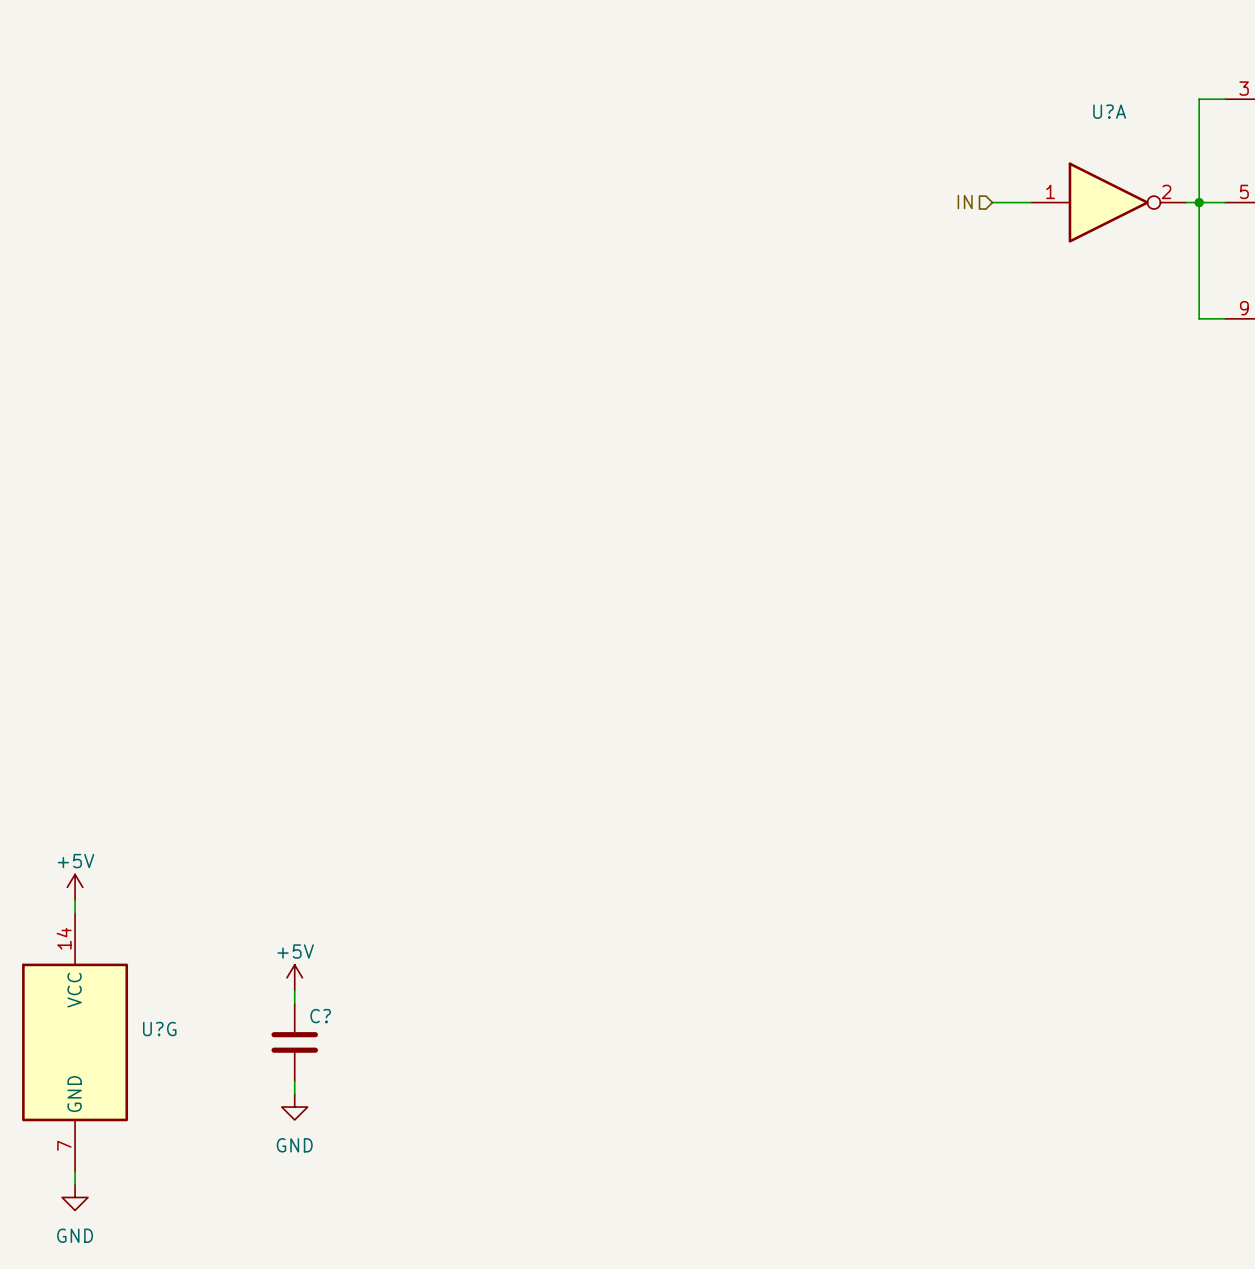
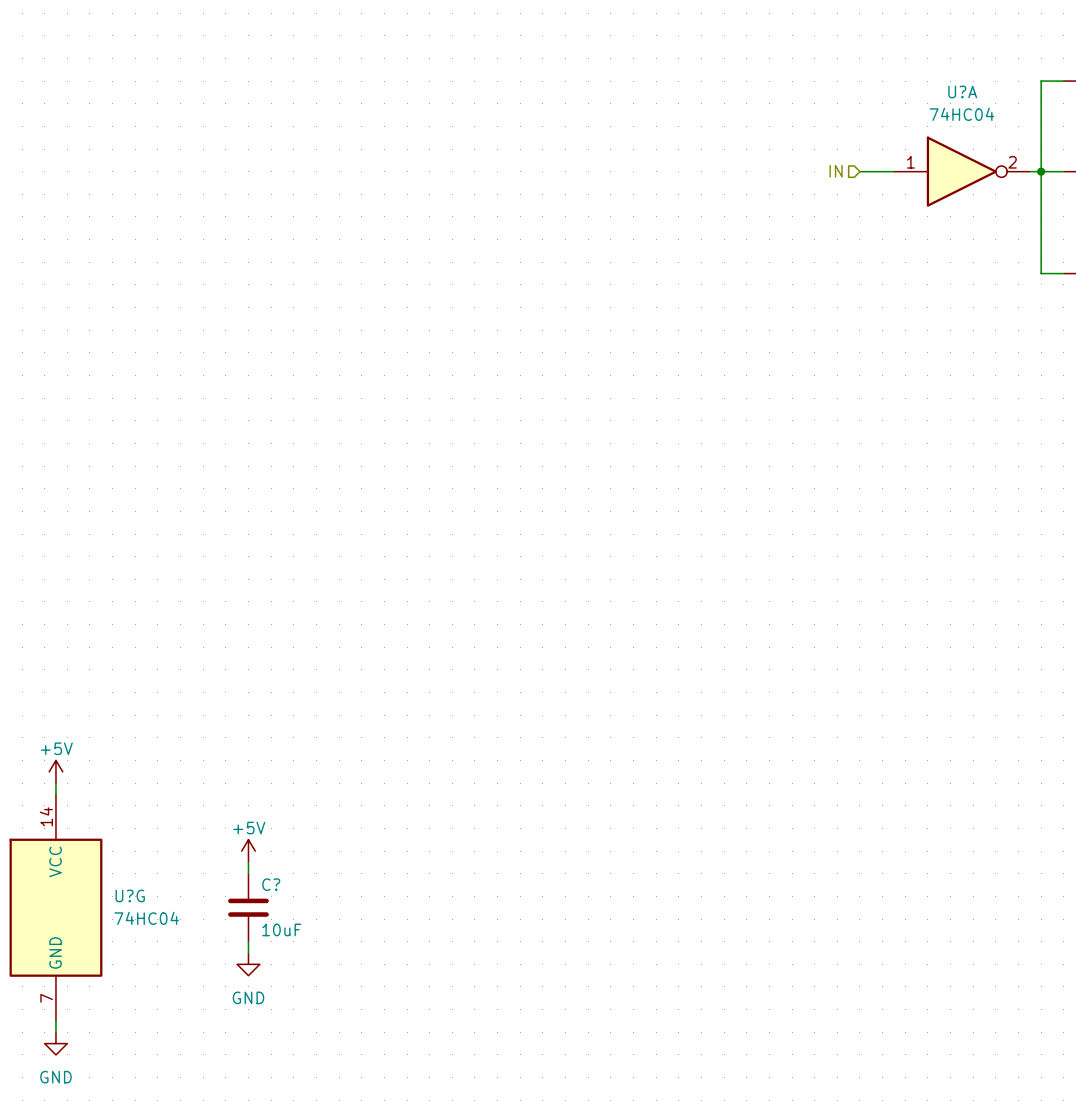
U?A value: none -> 74HC04 (961, 114)
U?G value: none -> 74HC04 (146, 918)
C? value: none -> 10uF (281, 929)

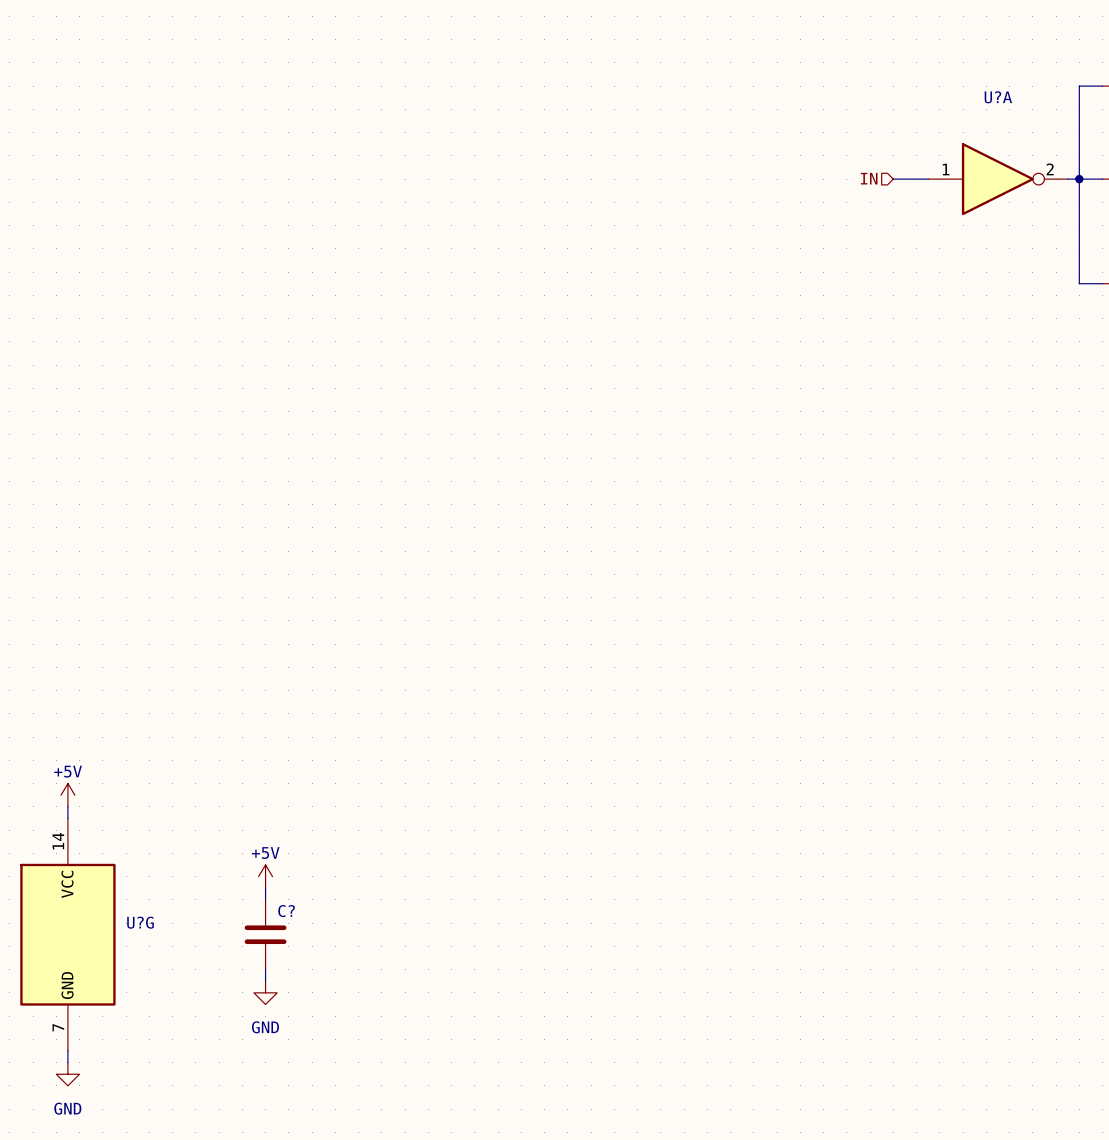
U?A value: 74HC04 (961, 114) -> none
U?G value: 74HC04 (146, 918) -> none
C? value: 10uF (281, 929) -> none

